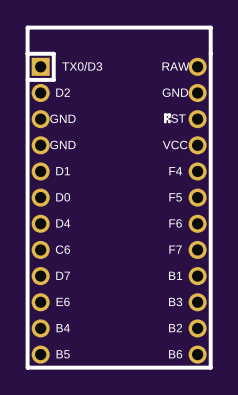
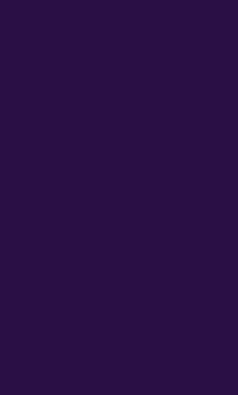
part: (119, 197) -> none

